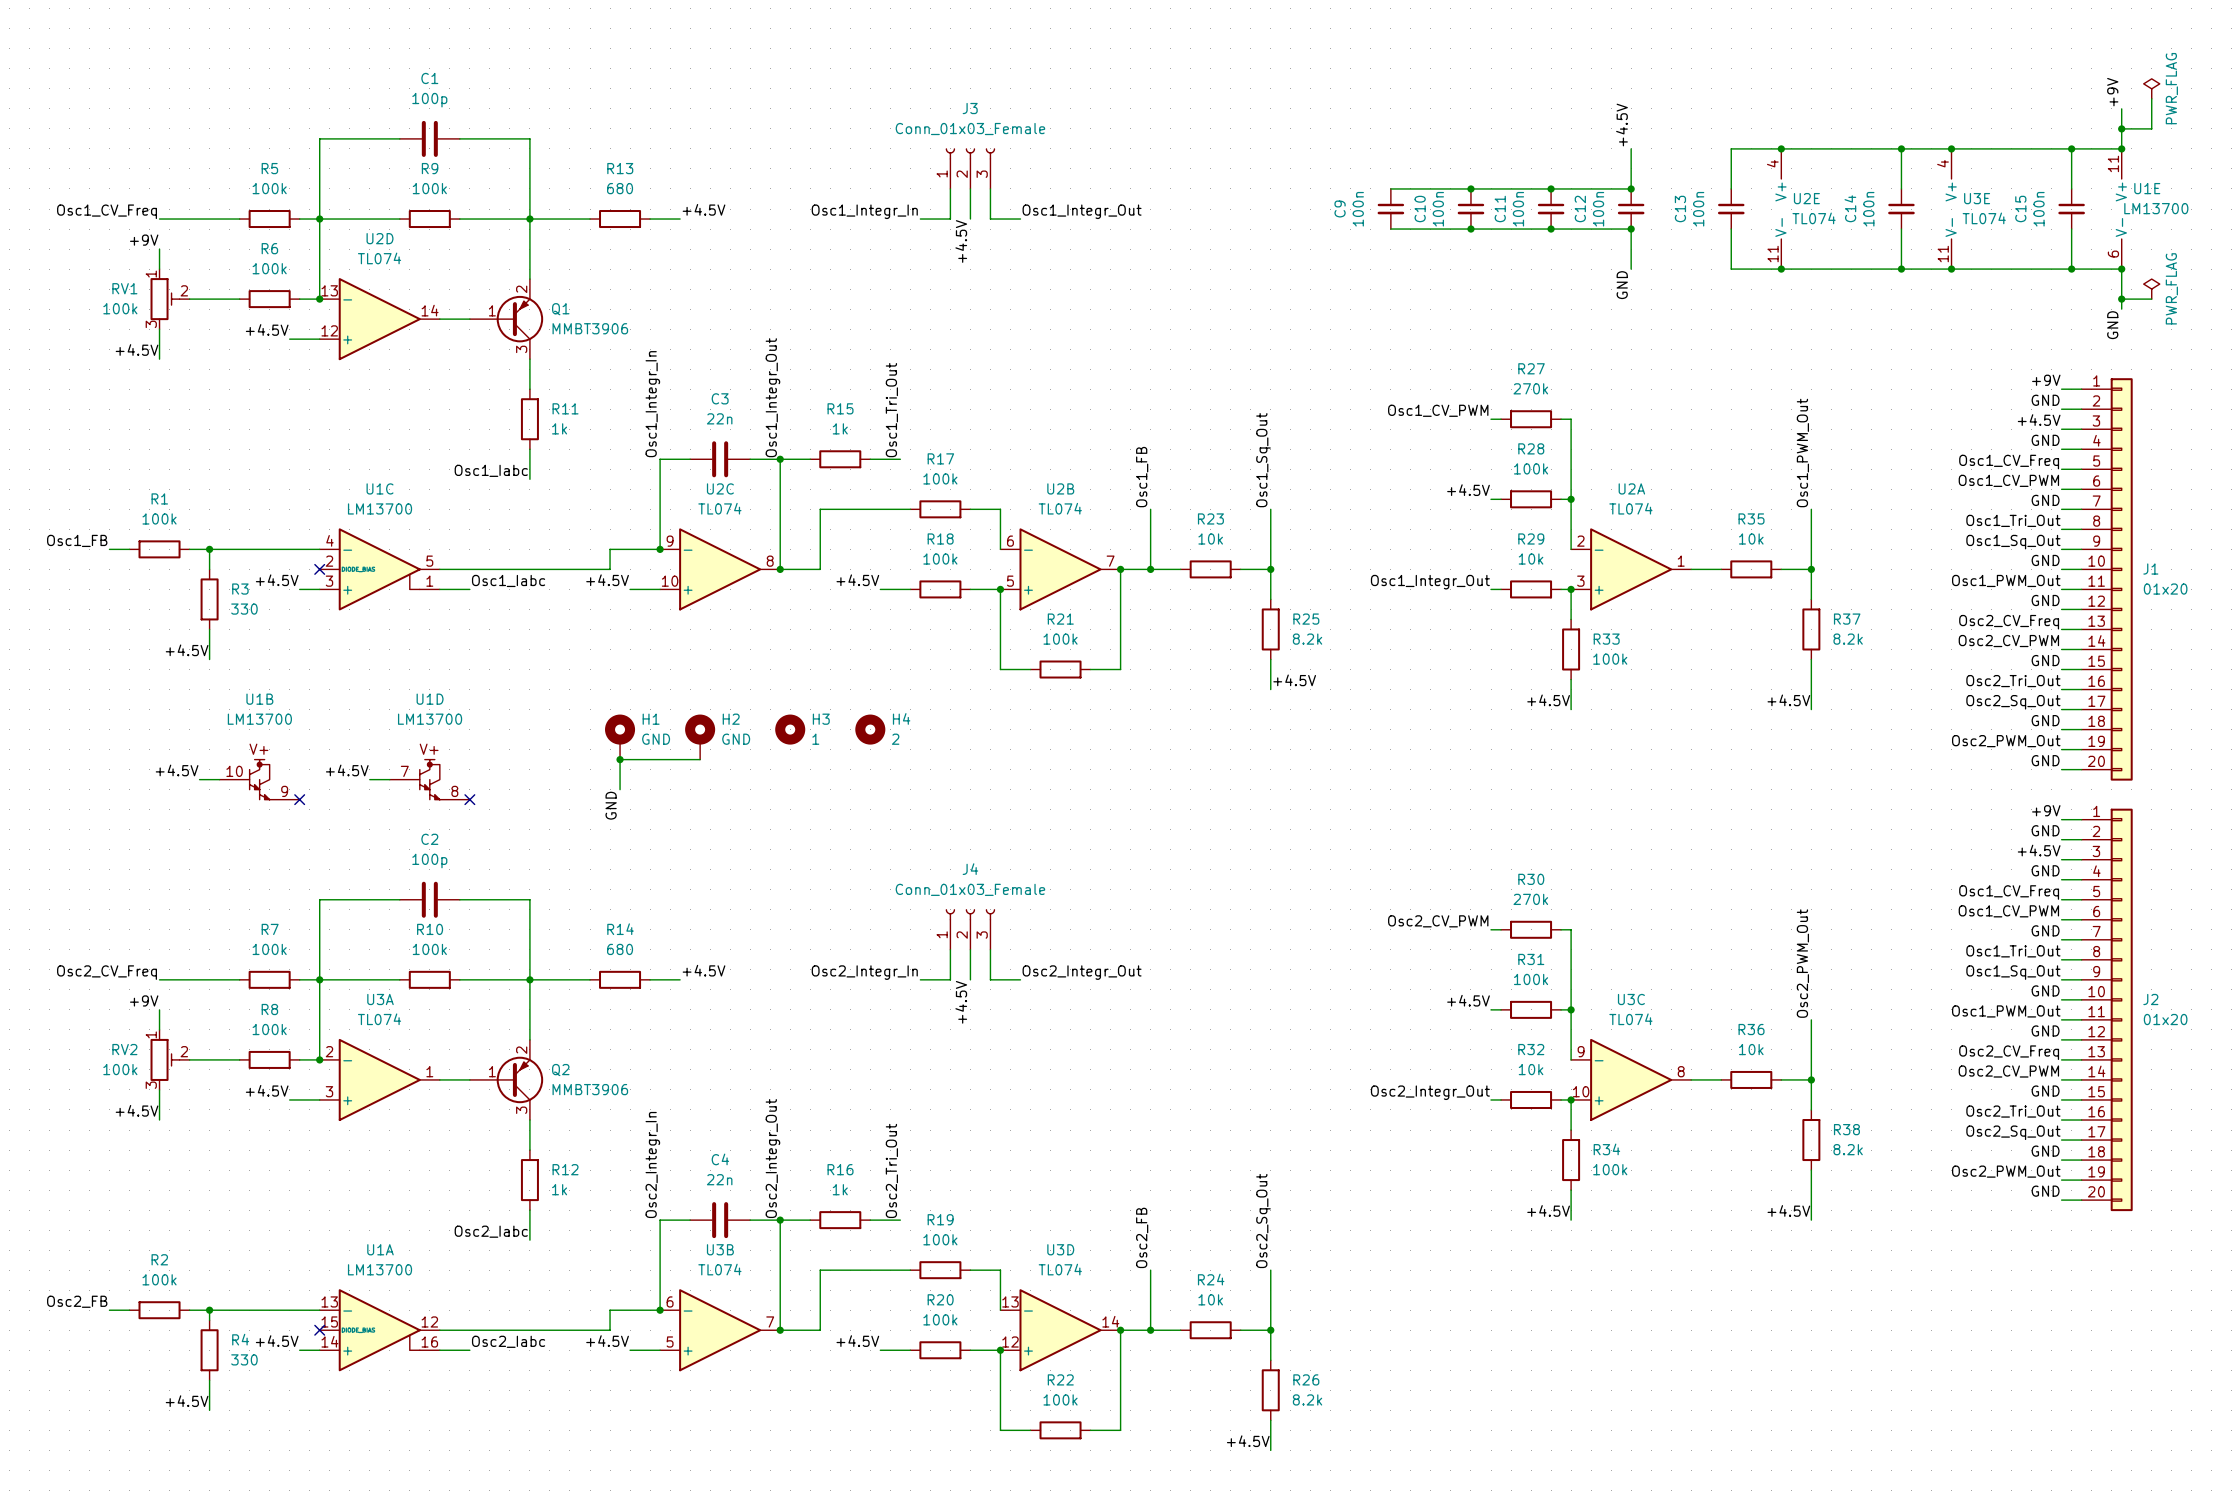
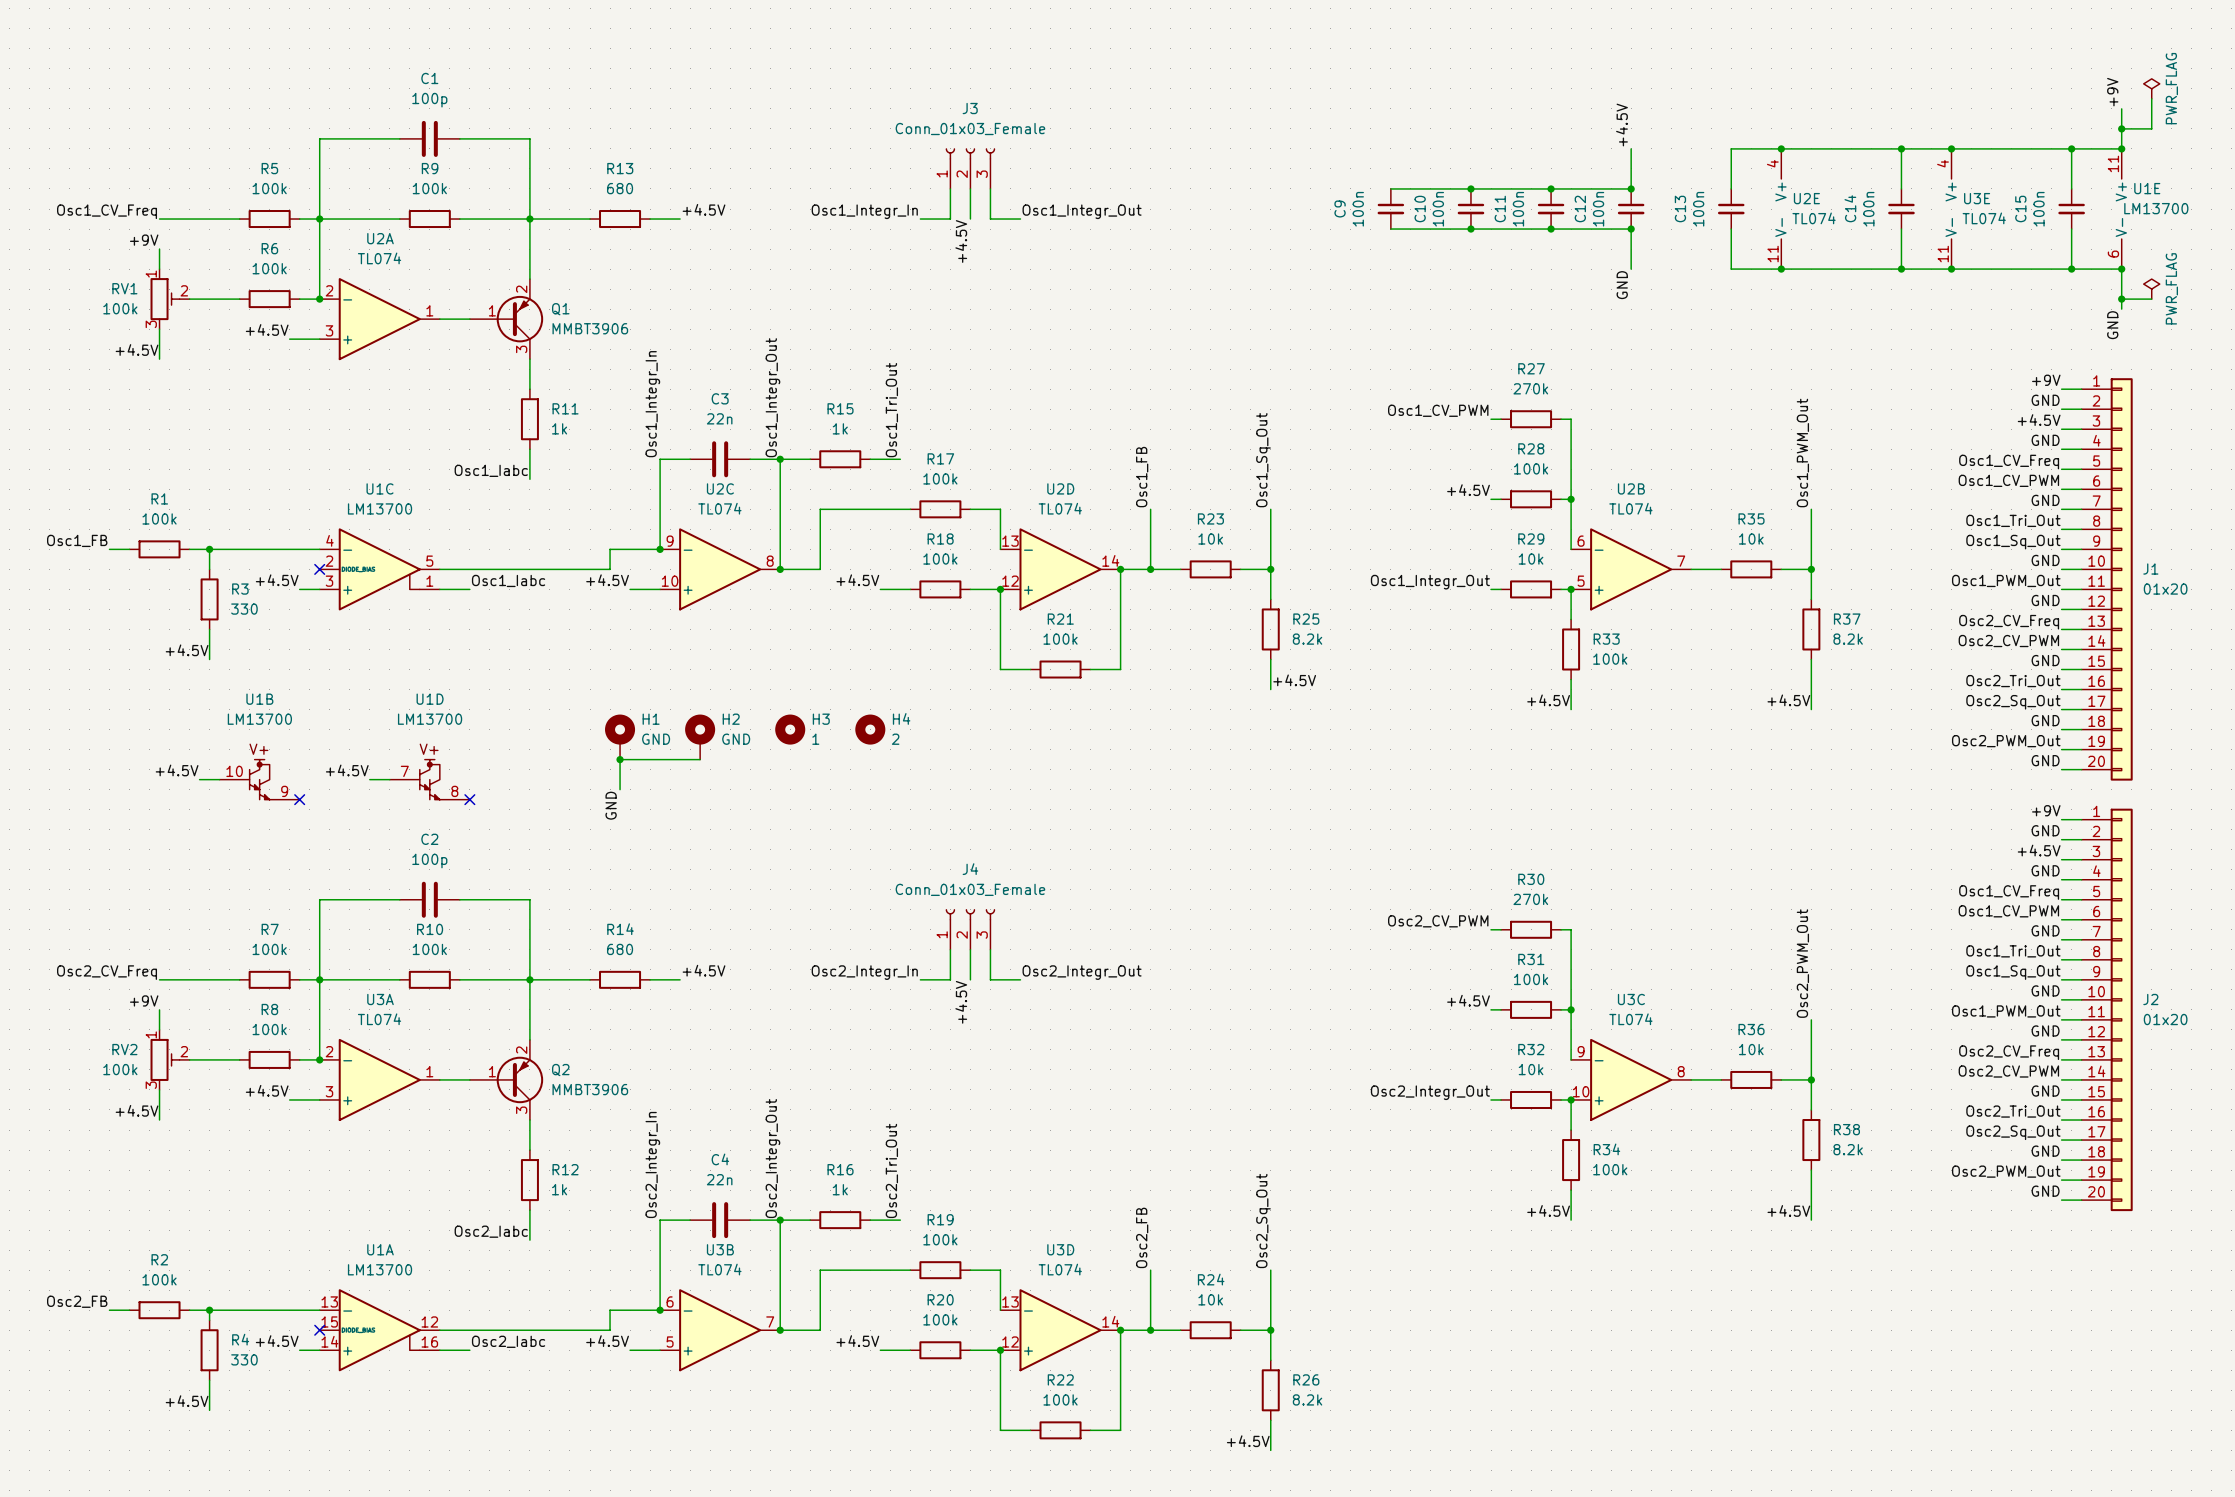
U2D position: (379, 319) -> (1060, 569)
U2B position: (1060, 569) -> (1631, 569)
U2A position: (1631, 569) -> (379, 319)

